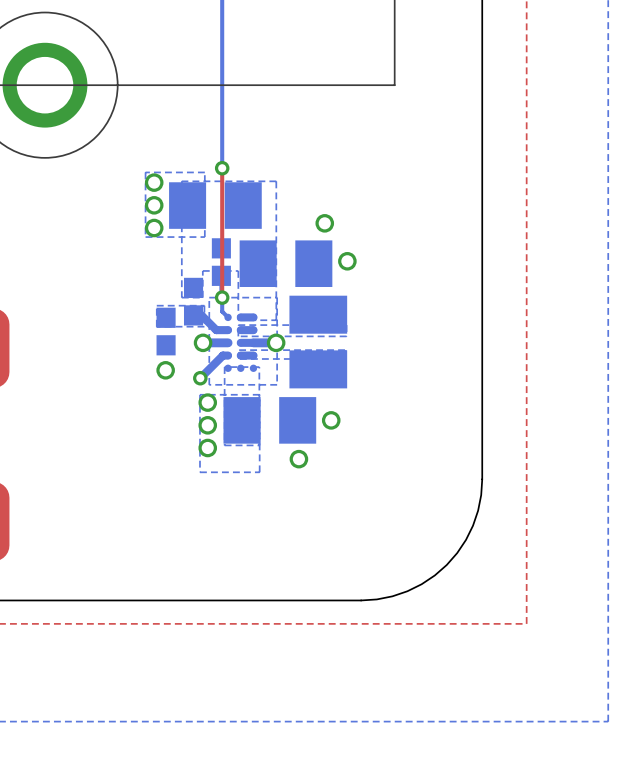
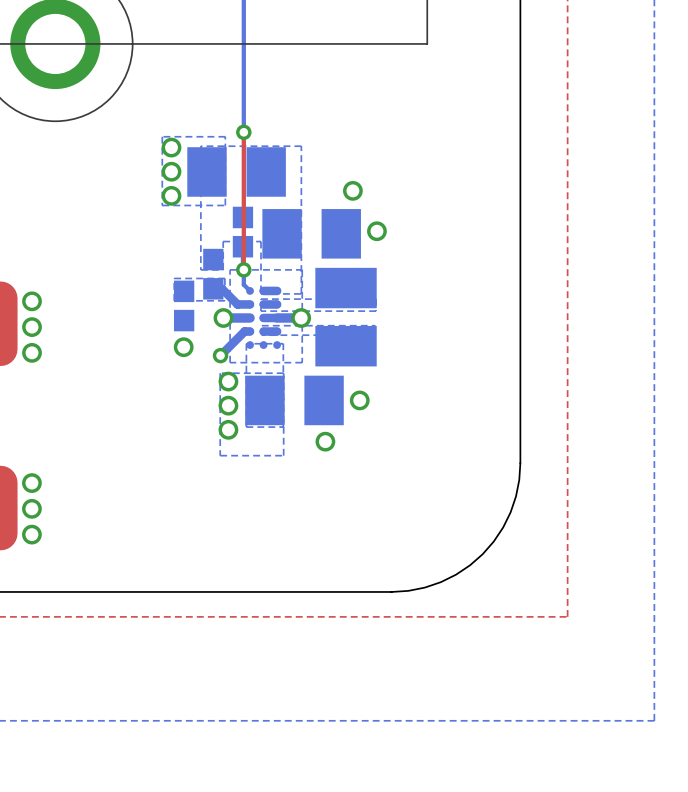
via: none -> (32, 301)
via: none -> (32, 327)
via: none -> (32, 352)
via: none -> (31, 483)
via: none -> (31, 508)
via: none -> (31, 534)

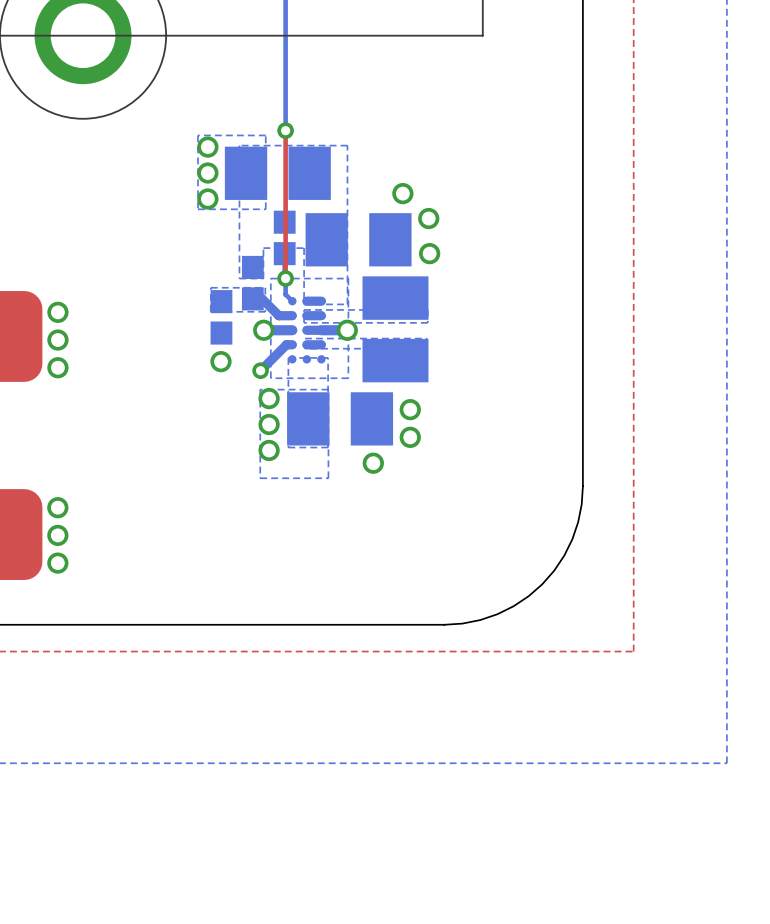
via: none -> (428, 218)
via: (376, 231) -> none
via: none -> (429, 253)
via: none -> (410, 409)
via: (359, 400) -> none
via: none -> (410, 437)

